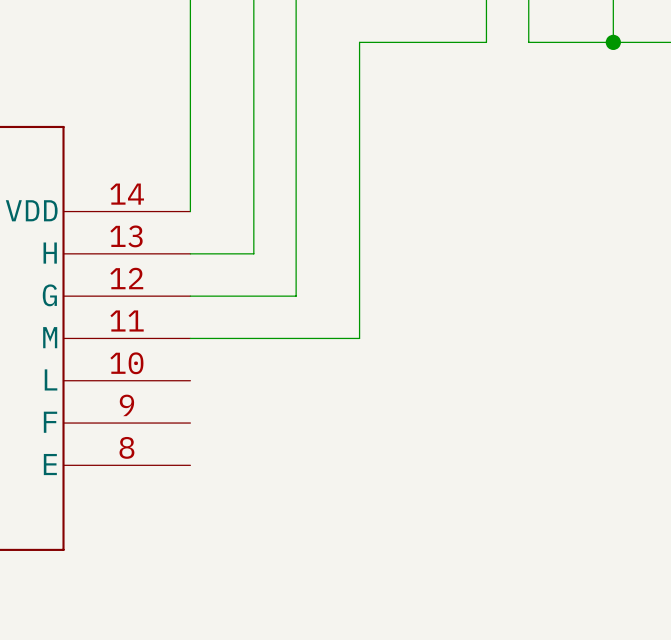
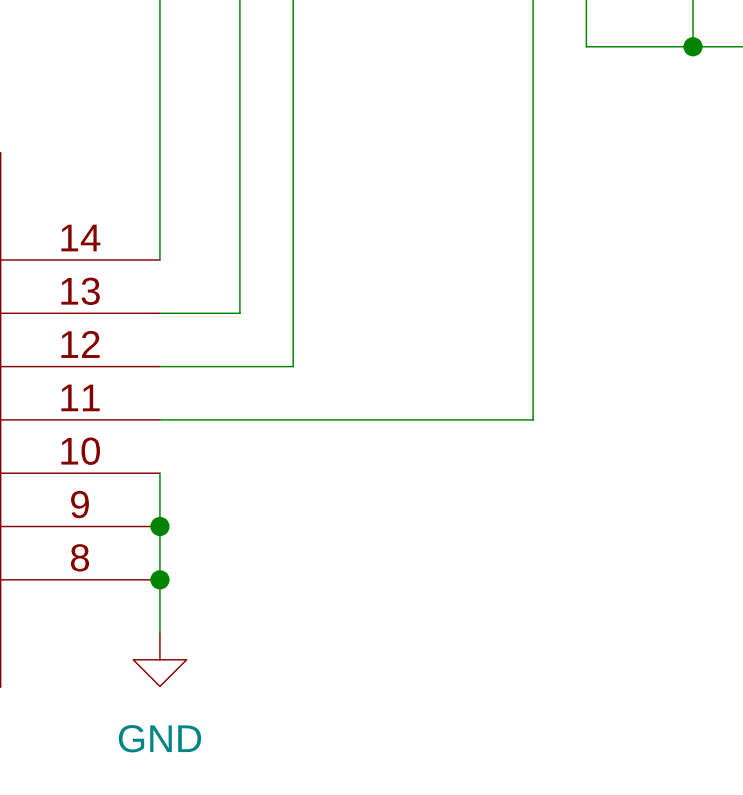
wire: (486, 42) (359, 42) (359, 338) -> (533, 46) (533, 419) (373, 419)
wire: none -> (159, 473) (159, 633)
junction: none -> (159, 526)
junction: none -> (159, 579)
power symbol: none -> GND (159, 659)

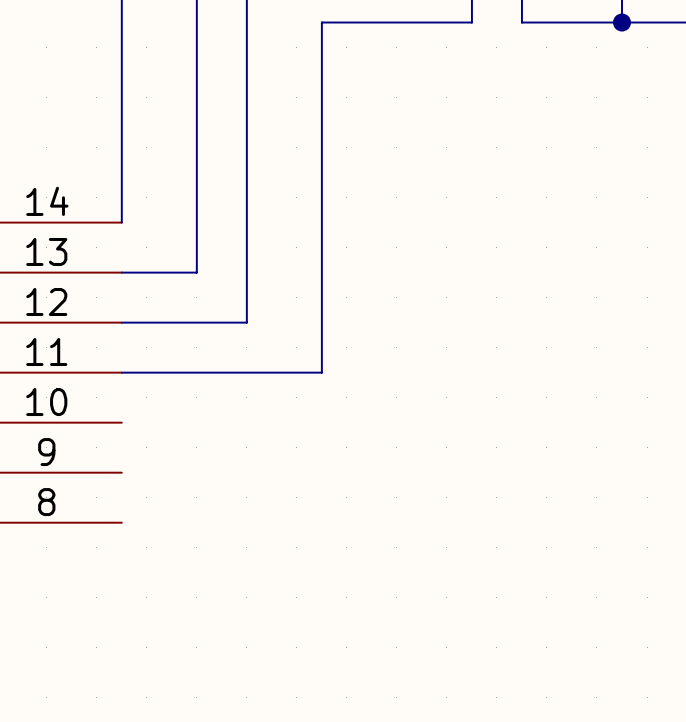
wire: (533, 46) (533, 419) (373, 419) -> (471, 22) (321, 22) (321, 372)
wire: (159, 473) (159, 633) -> none
junction: (159, 526) -> none
junction: (159, 579) -> none
power symbol: GND (159, 659) -> none

